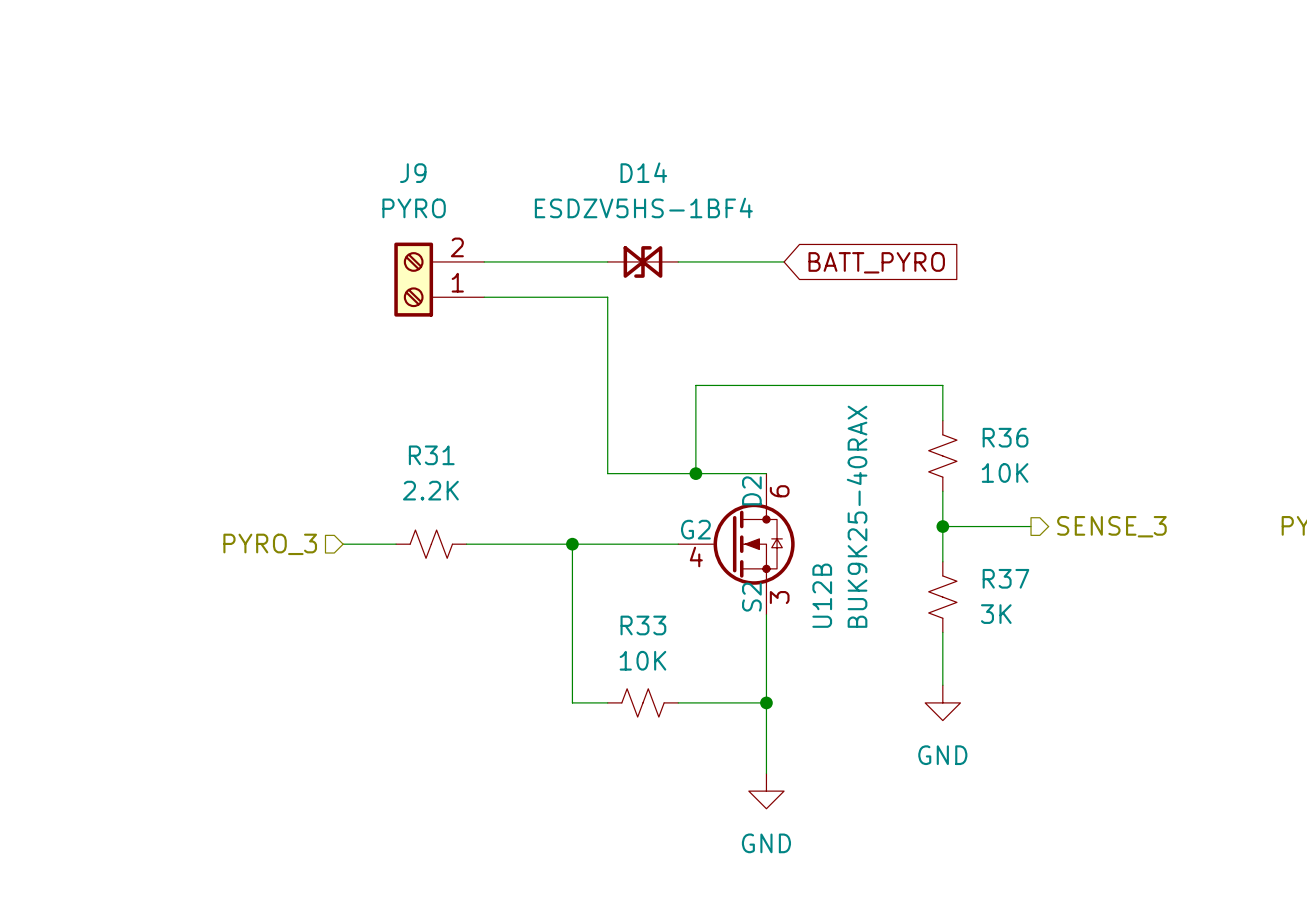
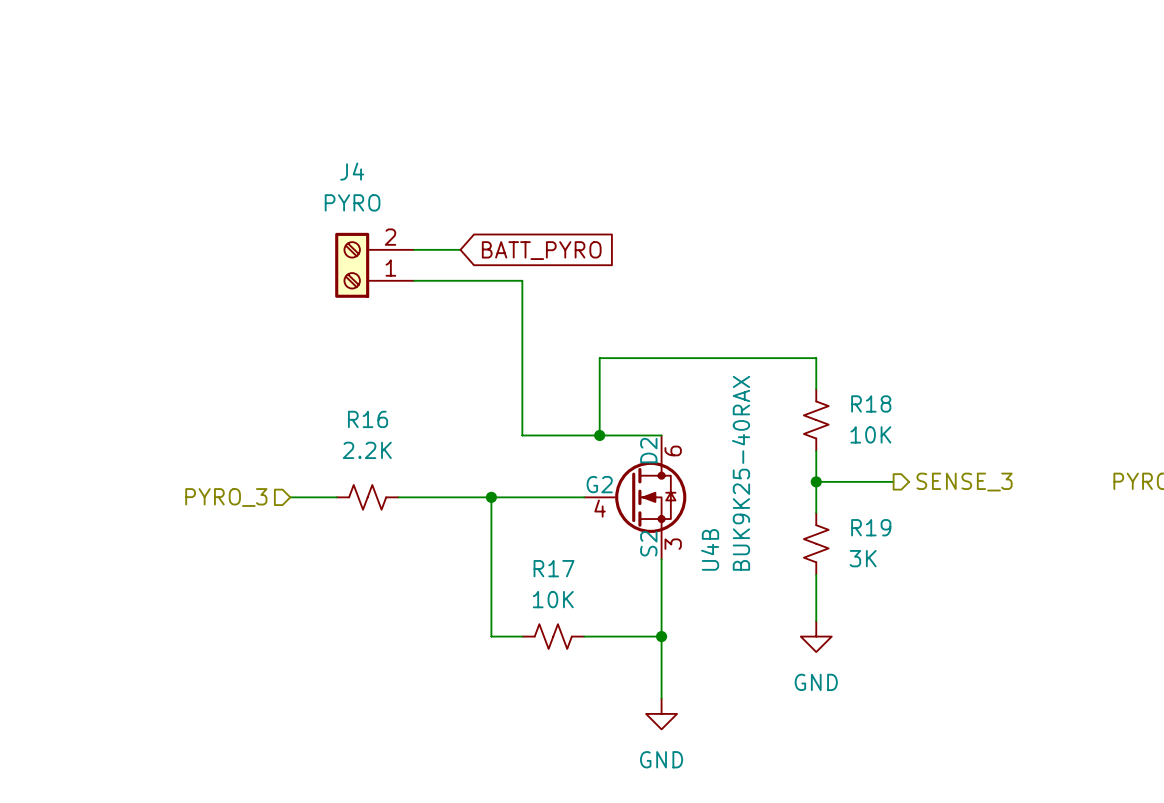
J9 name: J9 (413, 173) -> J4 (352, 171)
wire: (537, 261) (607, 261) -> none
D14: ESDZV5HS-1BF4 (642, 261) -> none
wire: (678, 261) (784, 261) -> none
global label position: BATT_PYRO (876, 262) -> BATT_PYRO (541, 250)
R36 name: R36 (1005, 437) -> R18 (871, 403)
R31 name: R31 (431, 455) -> R16 (368, 419)
R37 name: R37 (1005, 578) -> R19 (871, 527)
U12B name: U12B (822, 595) -> U4B (710, 549)
R33 name: R33 (643, 625) -> R17 (554, 568)

